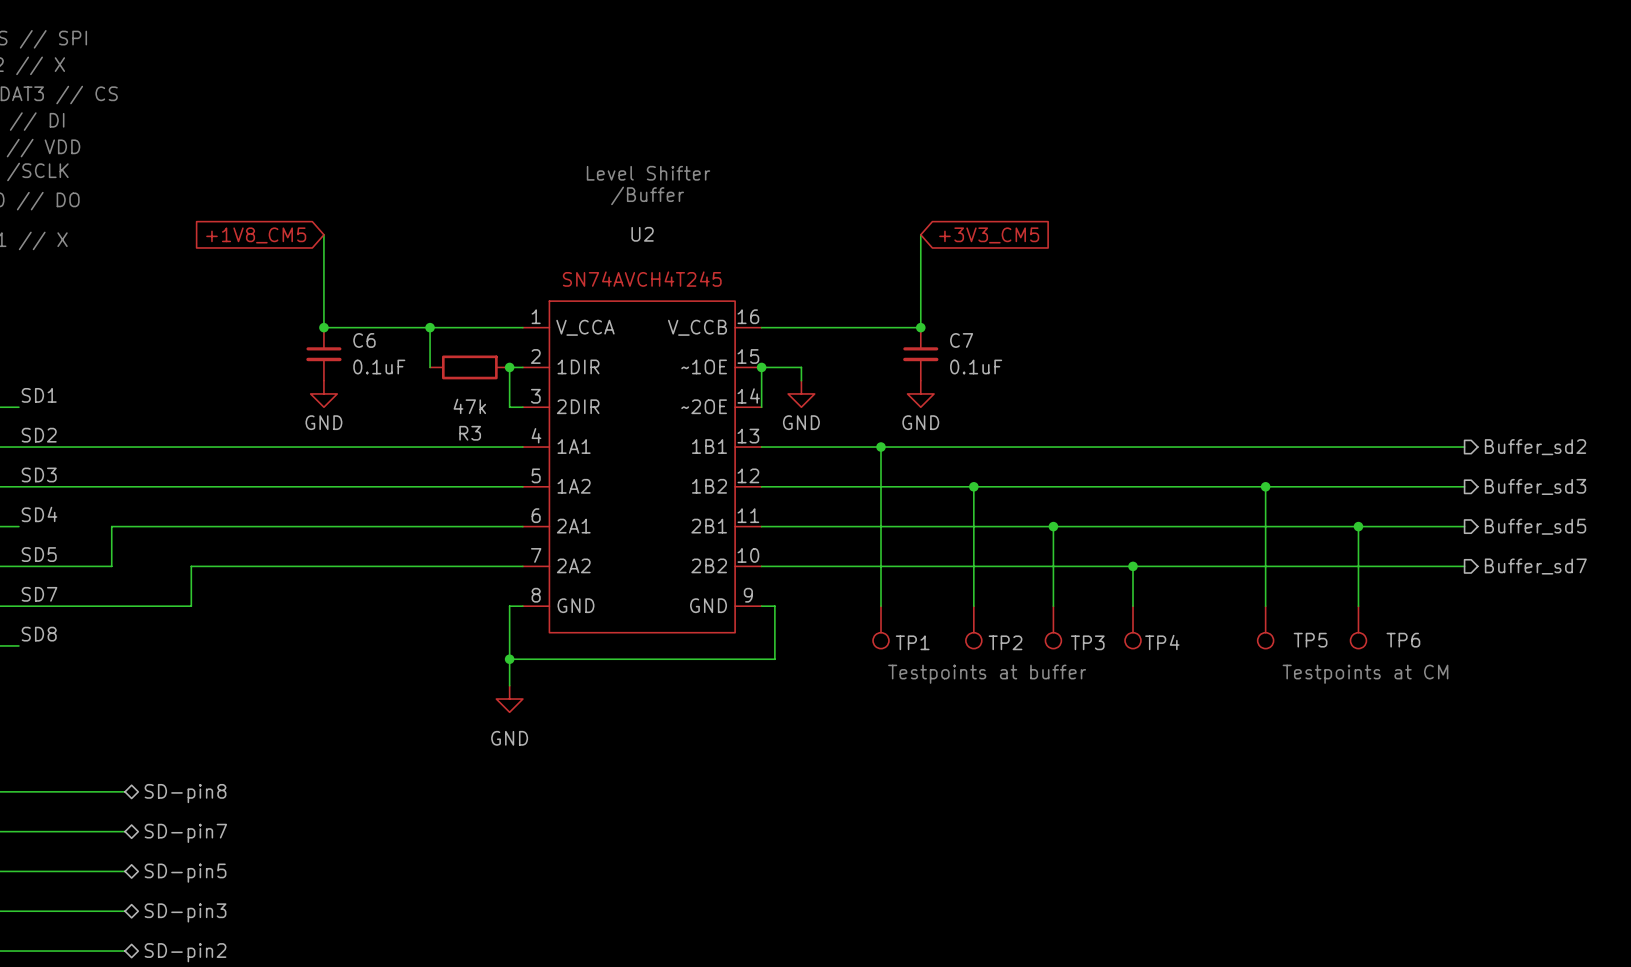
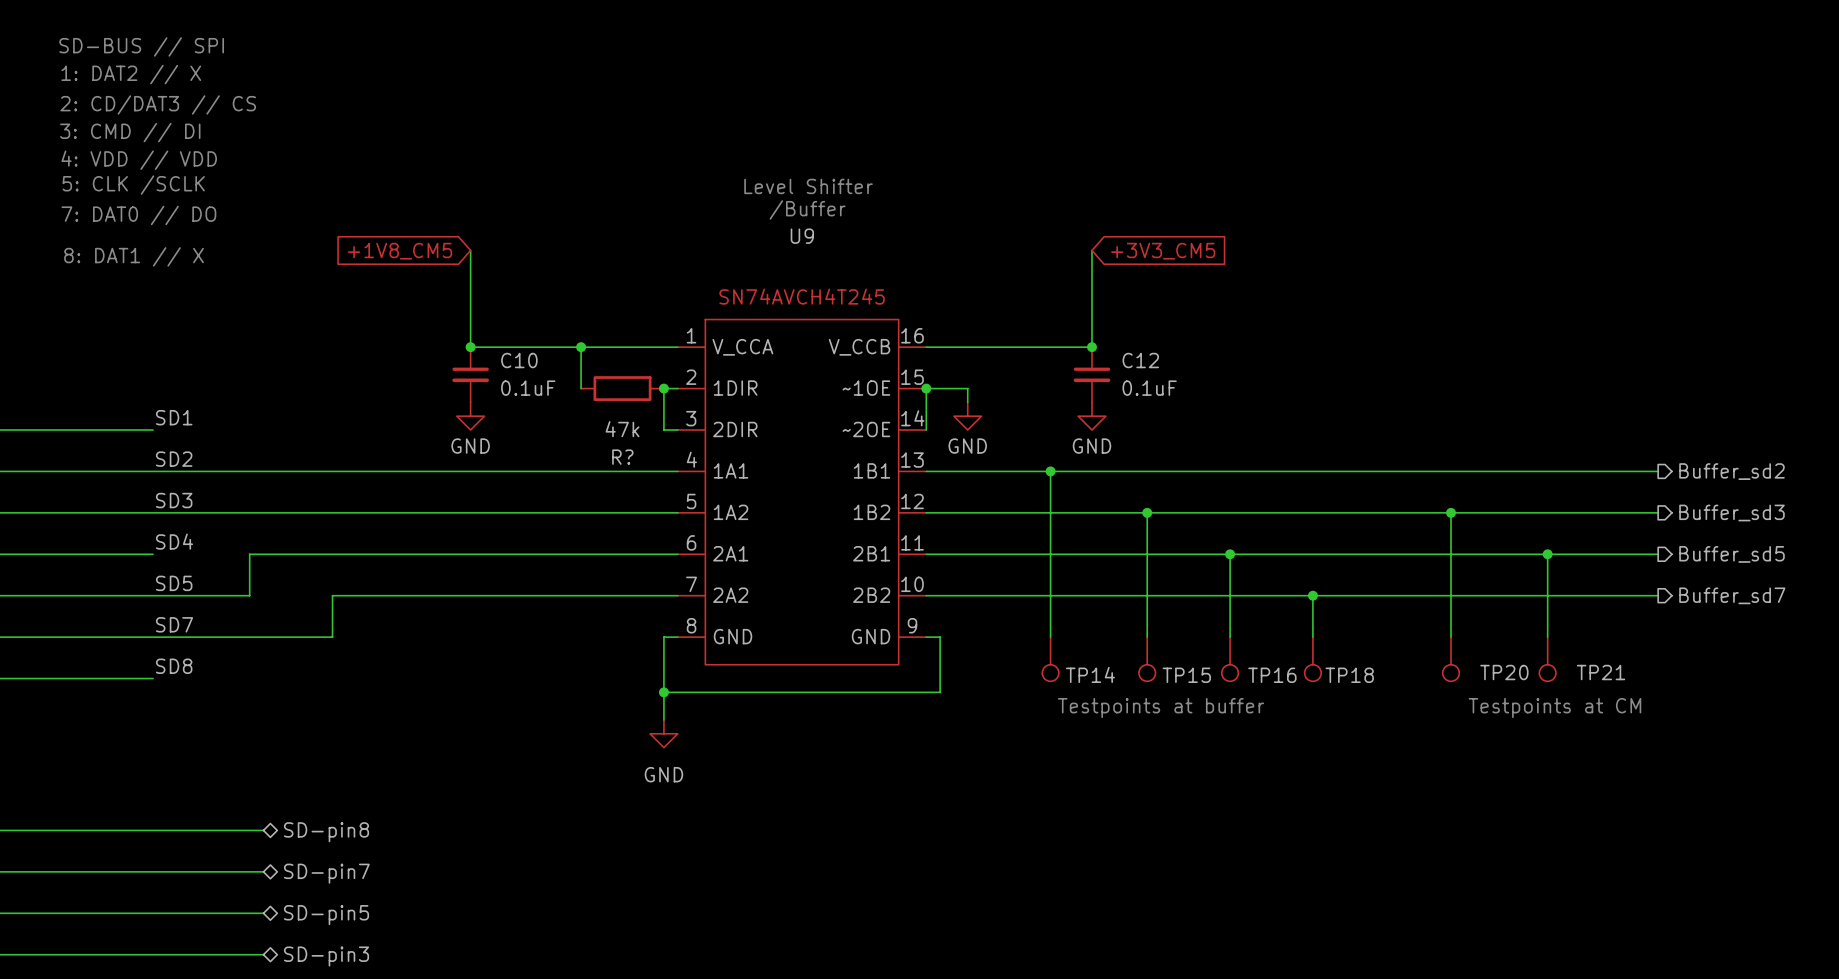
U2 name: U2 (642, 234) -> U9 (802, 236)
C6 name: C6 (364, 340) -> C10 (519, 360)
C7 name: C7 (961, 340) -> C12 (1140, 360)
R3 name: R3 (470, 433) -> R? (622, 457)
TP5 name: TP5 (1310, 640) -> TP20 (1504, 672)
TP6 name: TP6 (1403, 640) -> TP21 (1601, 672)
TP1 name: TP1 (912, 642) -> TP14 (1090, 674)
TP2 name: TP2 (1005, 642) -> TP15 (1186, 675)
TP3 name: TP3 (1087, 642) -> TP16 (1272, 675)
TP4 name: TP4 (1162, 642) -> TP18 (1349, 675)

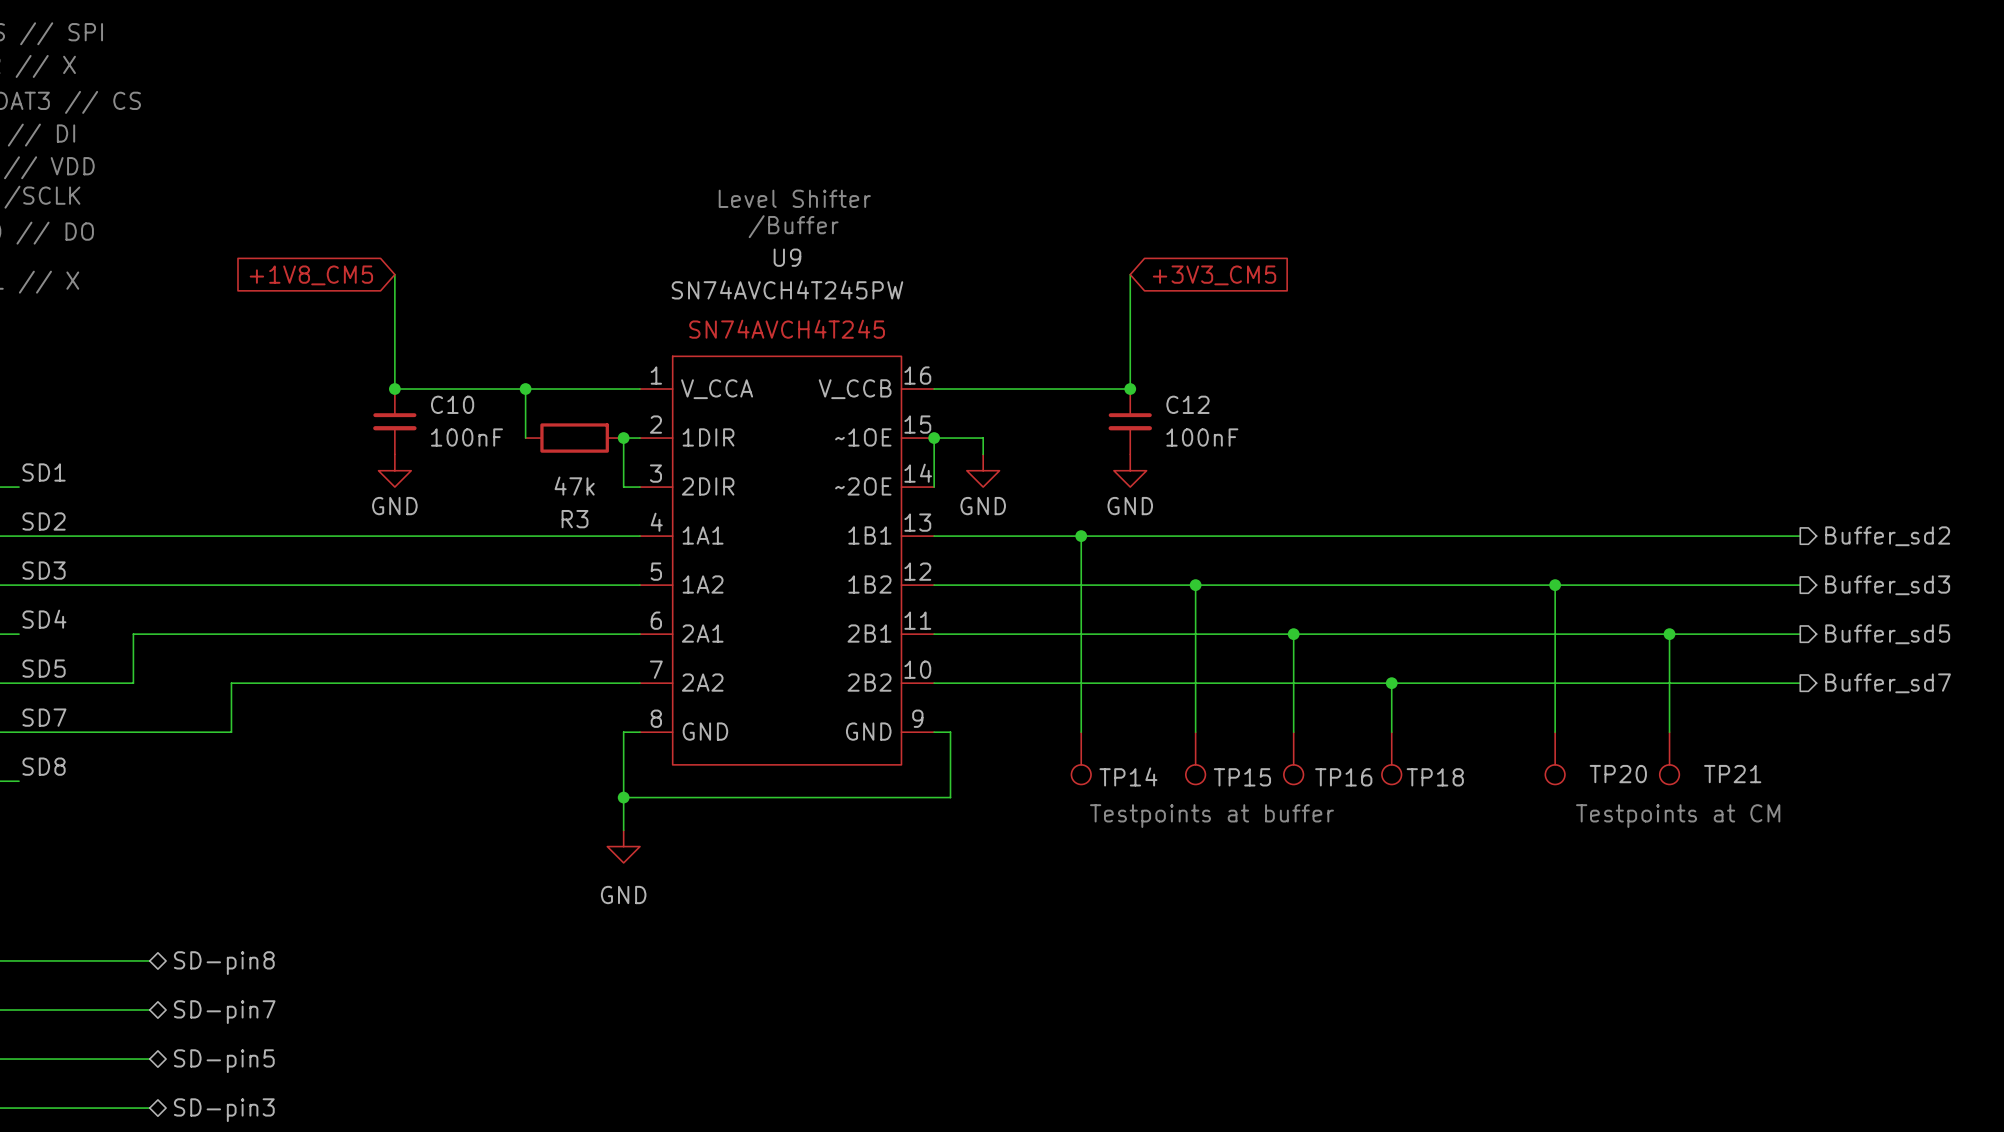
U9 value: none -> SN74AVCH4T245PW (787, 289)
C10 value: 0.1uF (528, 388) -> 100nF (466, 437)
C12 value: 0.1uF (1149, 388) -> 100nF (1202, 437)
R? name: R? (622, 457) -> R3 (575, 519)

